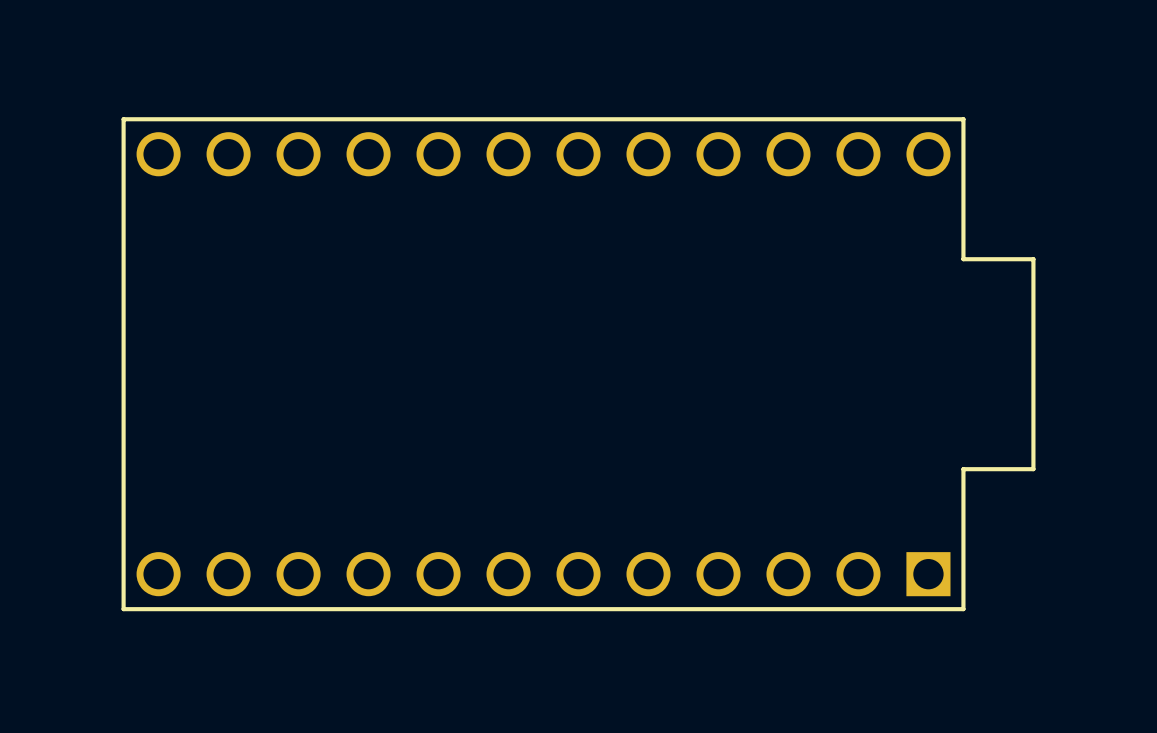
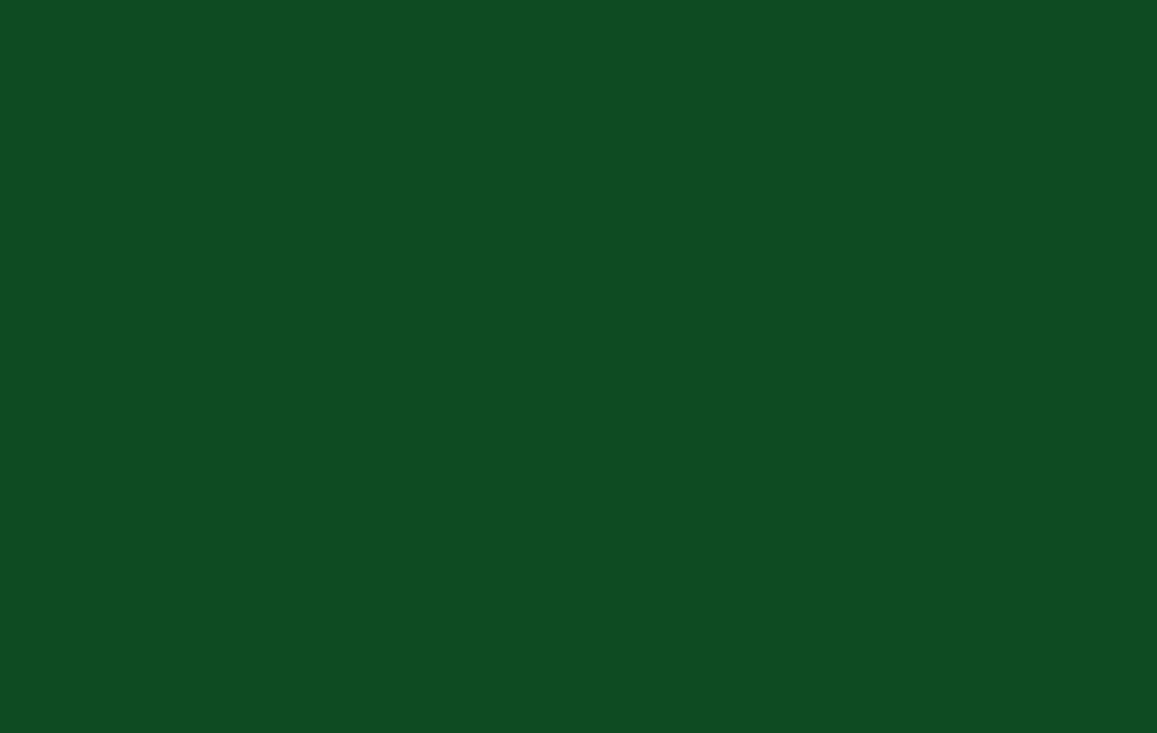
part: (578, 364) -> none

